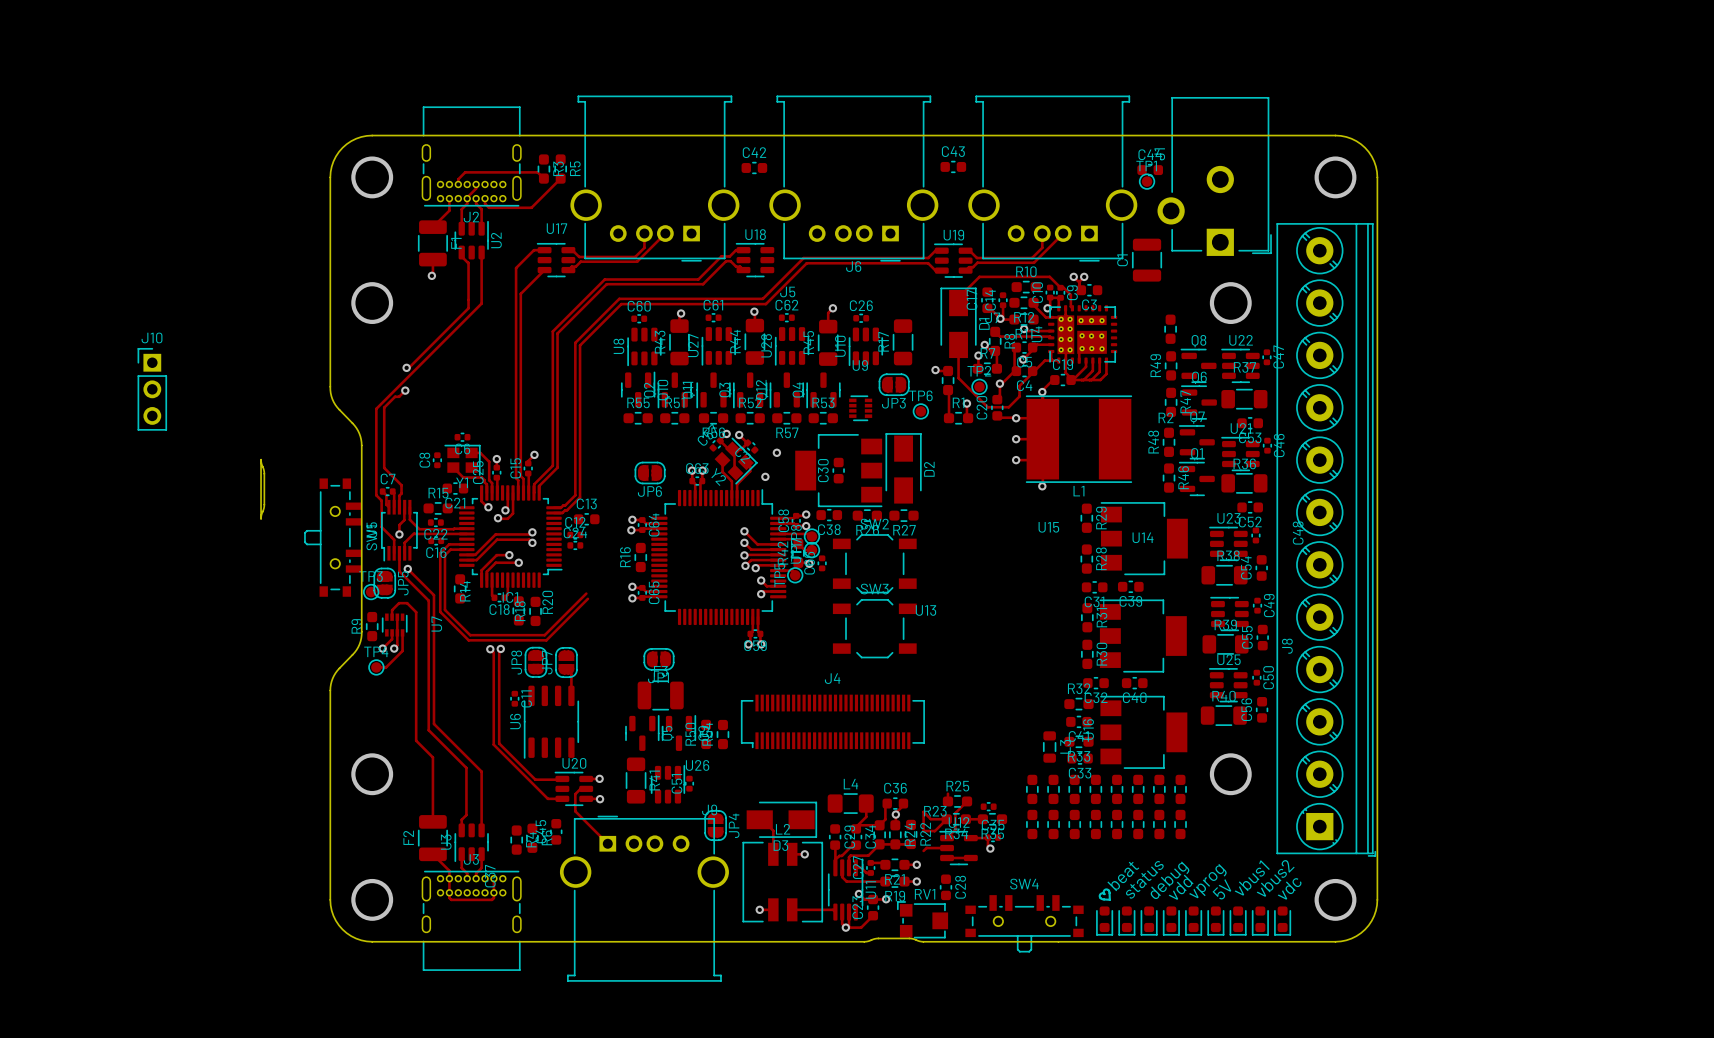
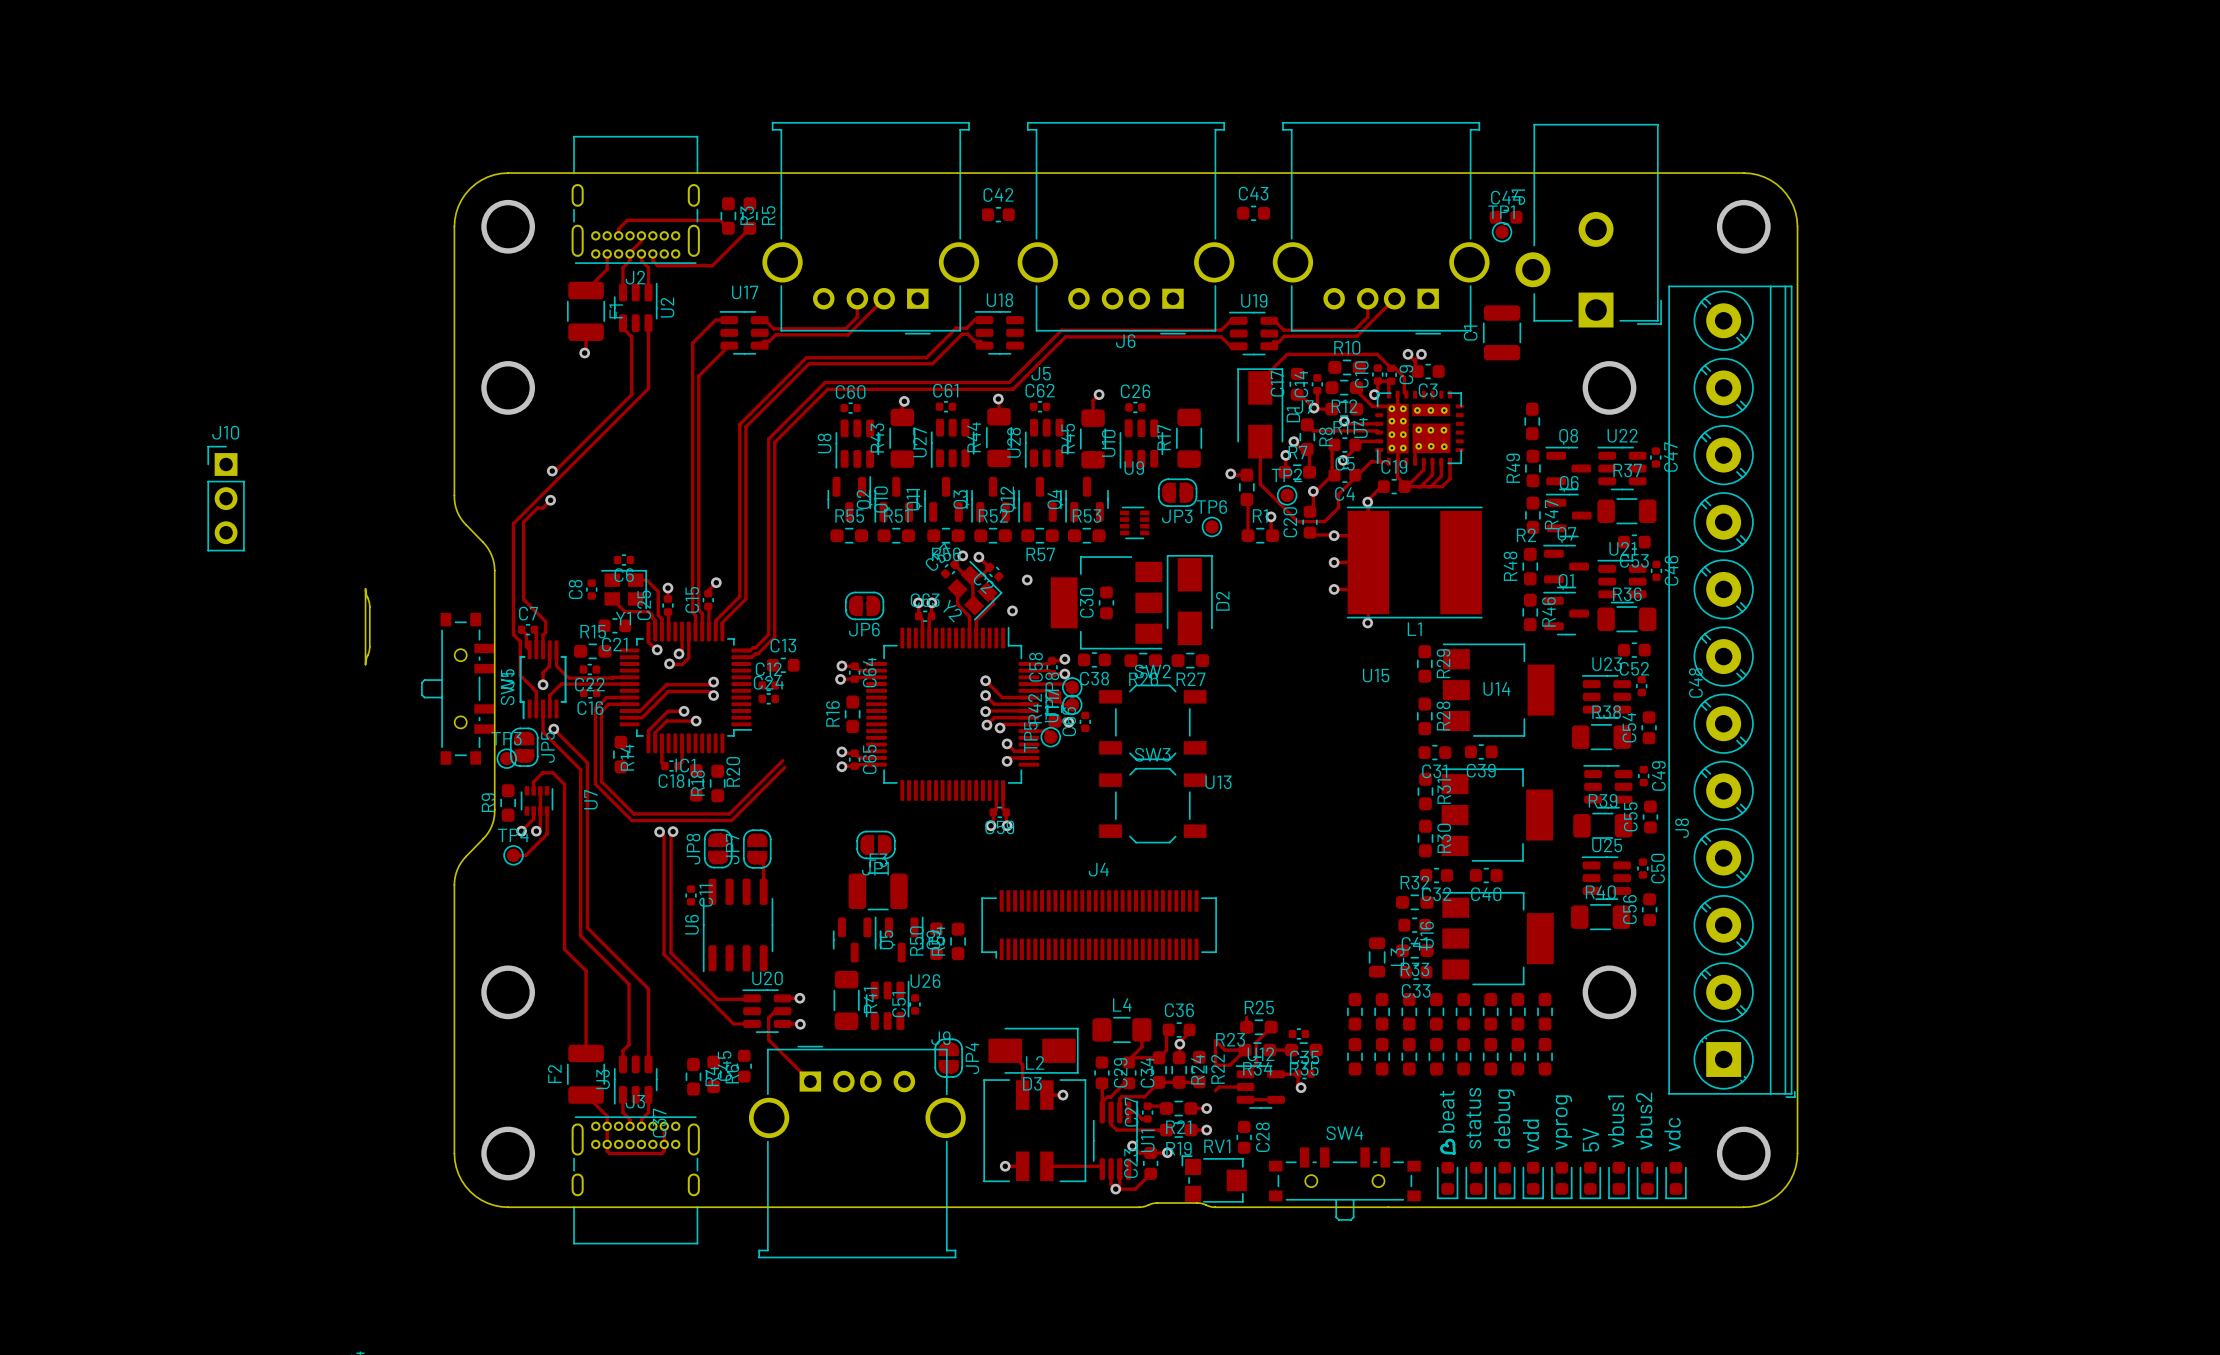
text: none -> beat (1446, 1111)
text: beat (1123, 876) -> status (1473, 1118)
text rotation: 0° (1252, 877) -> 45° counterclockwise (1616, 1121)
text rotation: 0° (1275, 878) -> 45° counterclockwise (1644, 1121)
text: status (1144, 879) -> debug (1504, 1118)
text: debug (1170, 880) -> none
text rotation: 0° (1207, 881) -> 45° counterclockwise (1563, 1122)
text rotation: 0° (1181, 887) -> 45° counterclockwise (1531, 1136)
text rotation: 0° (1289, 888) -> 45° counterclockwise (1672, 1134)
text rotation: 0° (1221, 889) -> 45° counterclockwise (1590, 1139)

